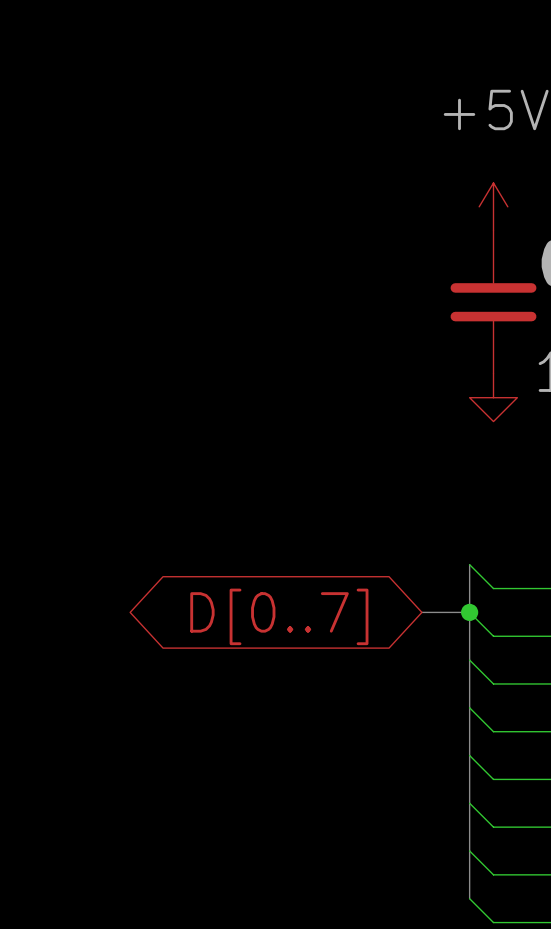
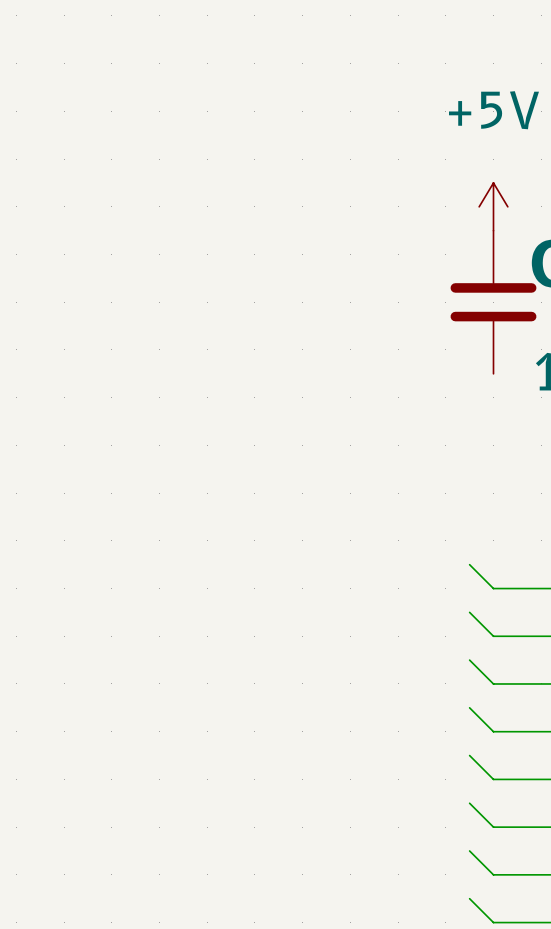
power symbol: (493, 397) -> none
bus: (469, 564) (469, 898) -> none
bus: (421, 612) (469, 612) -> none
junction: (469, 612) -> none
global label: D[0..7] (279, 616) -> none

